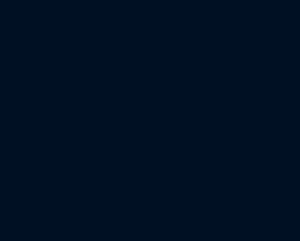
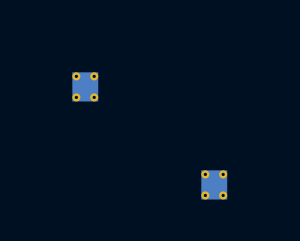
part: none -> (85, 86)
part: none -> (214, 184)

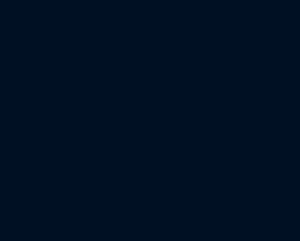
part: (85, 86) -> none
part: (214, 184) -> none

